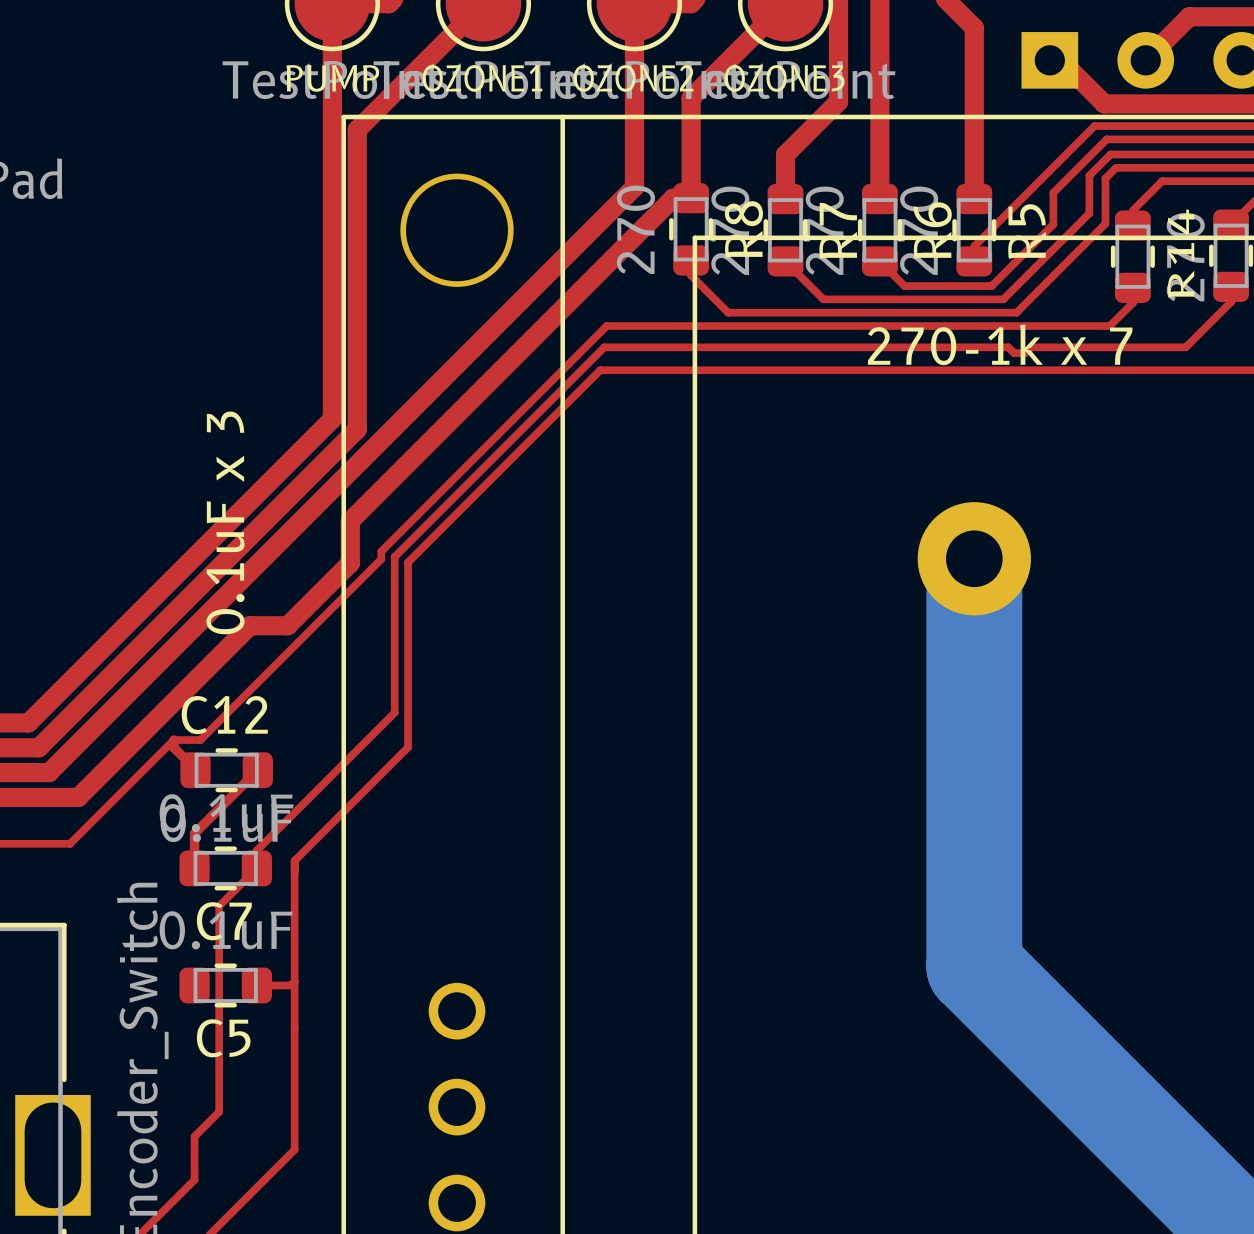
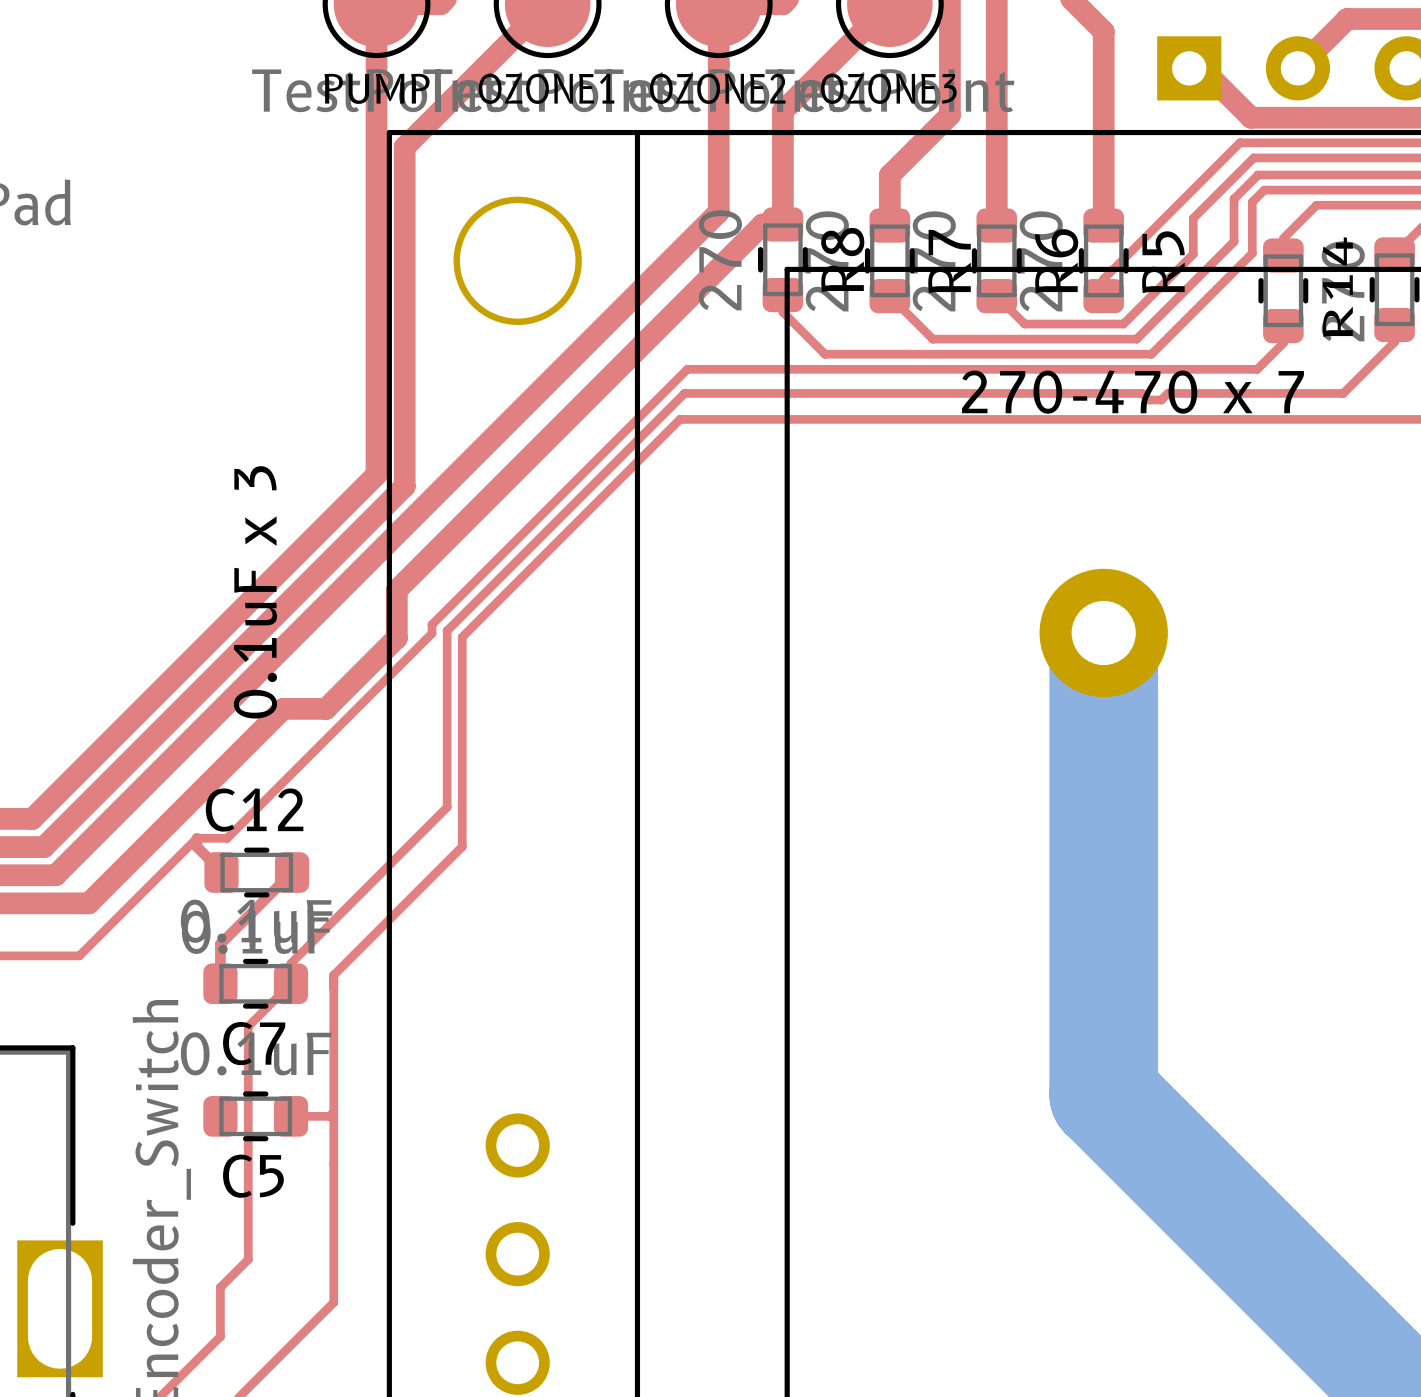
text: 270-1k x 7 (1000, 344) -> 270-470 x 7 (1132, 392)

